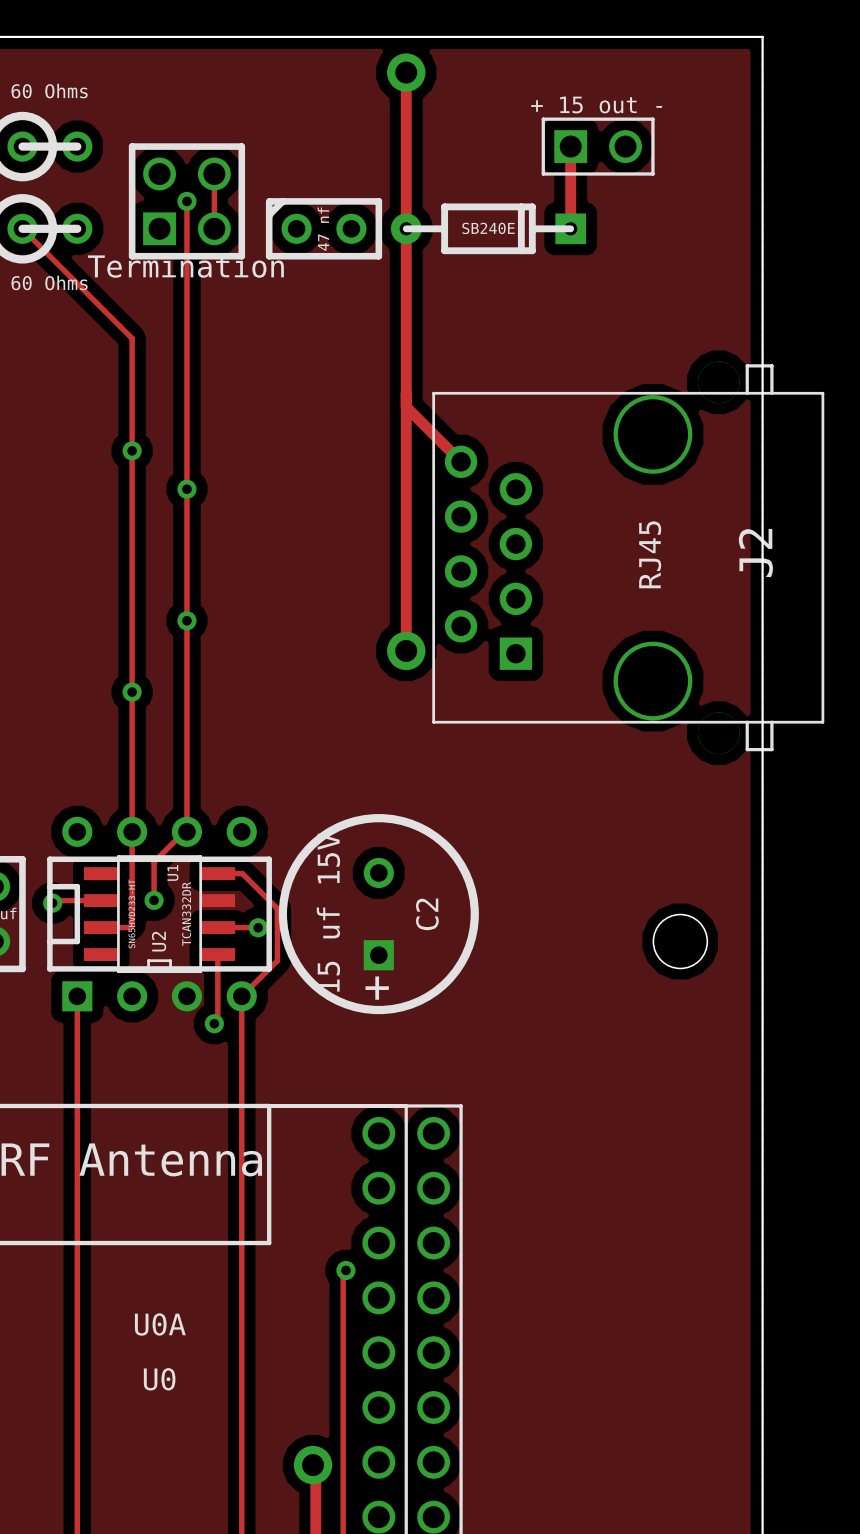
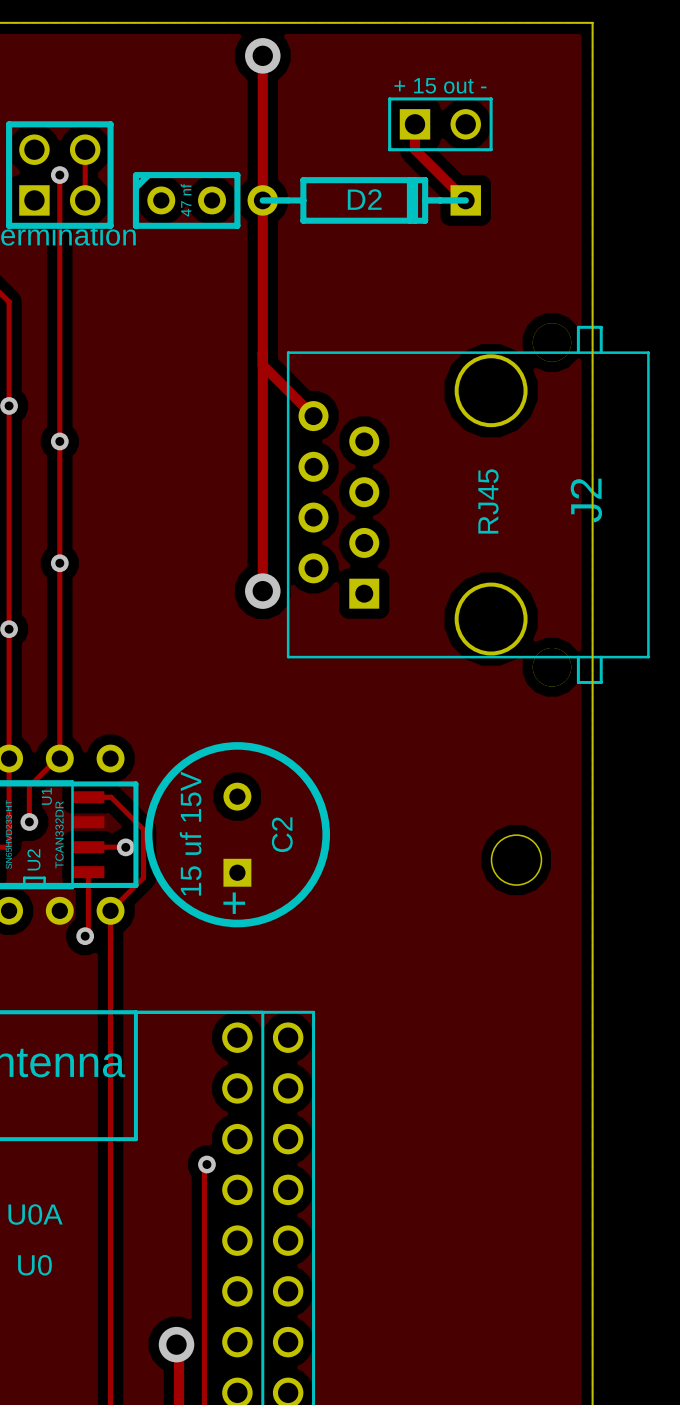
track: (570, 173) (570, 228) -> (415, 149) (465, 200)
part: SB240E (488, 228) -> none
D2: none -> (364, 200)

